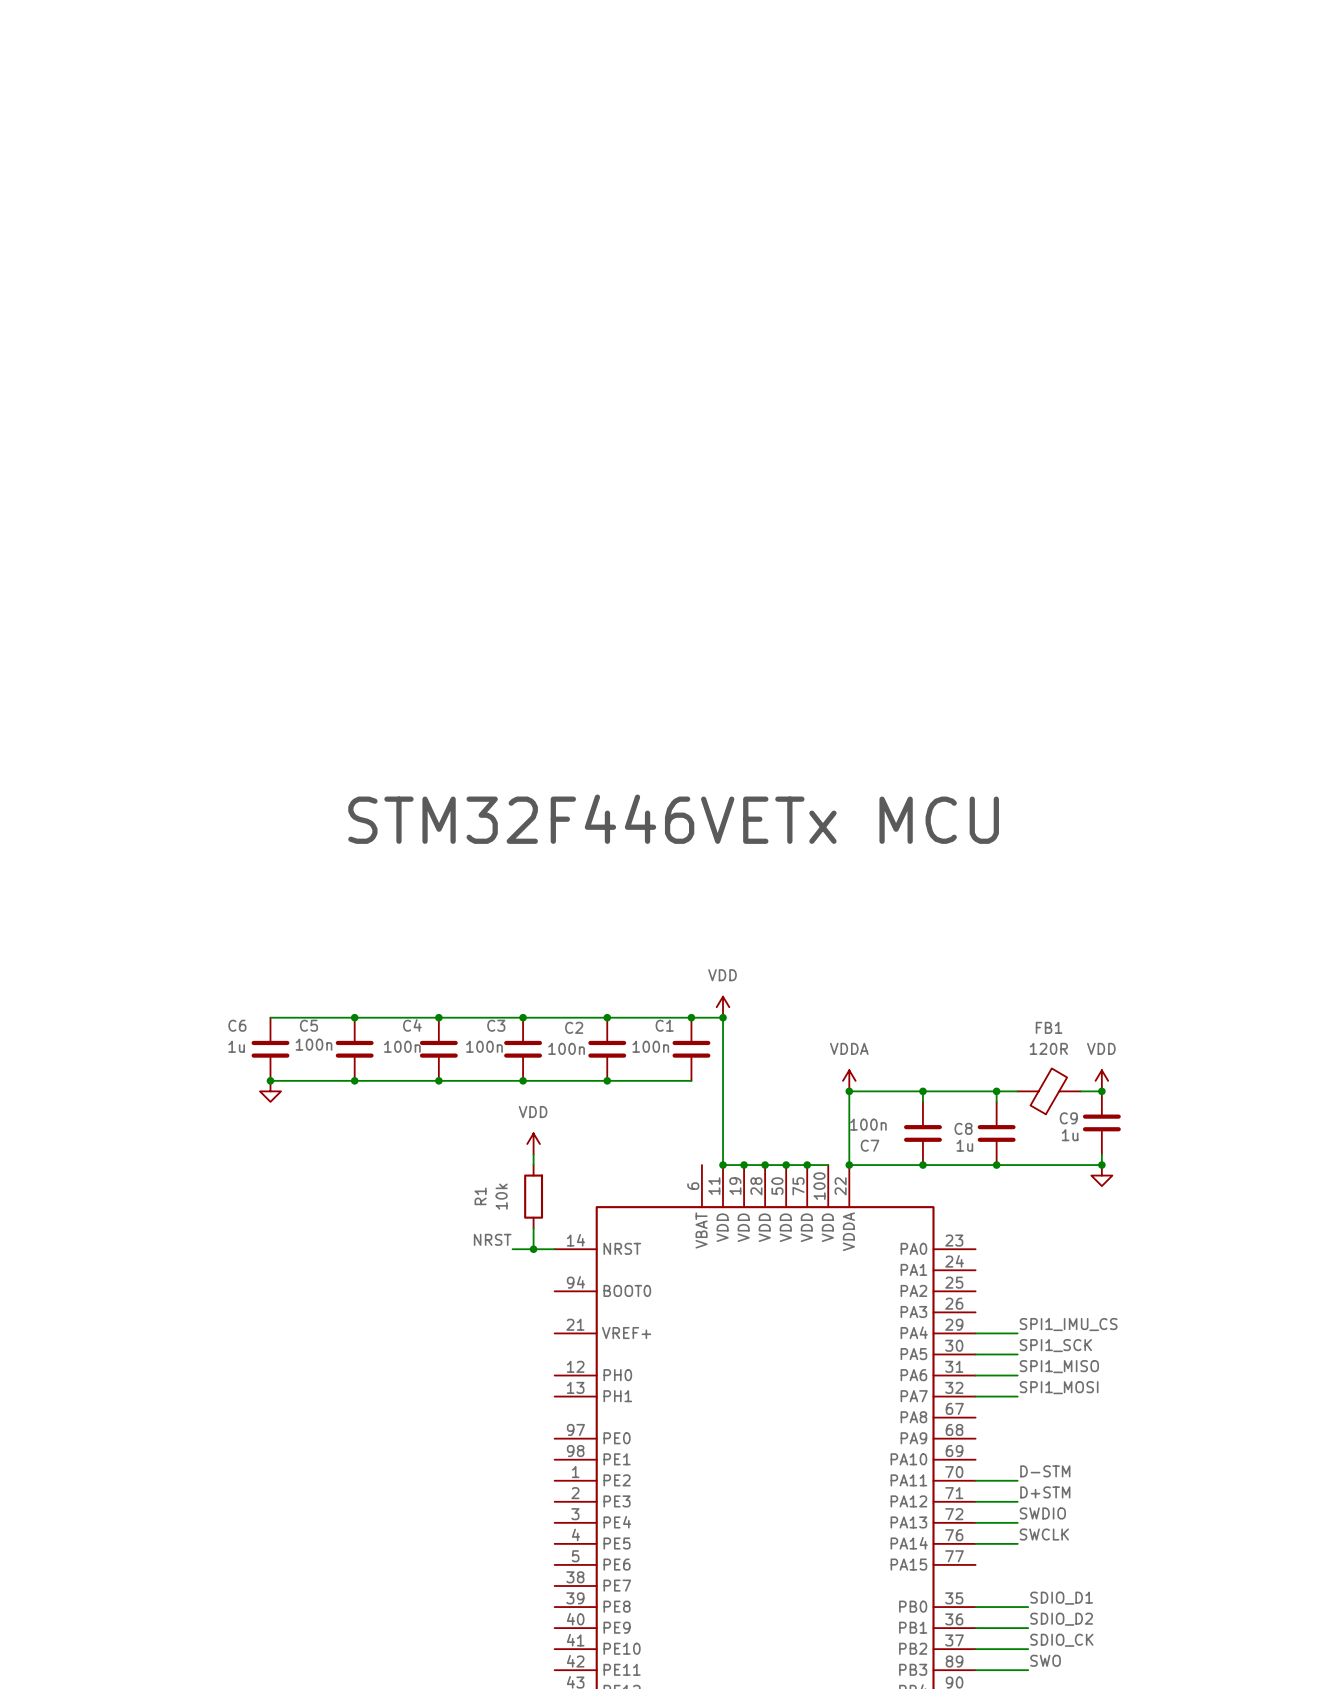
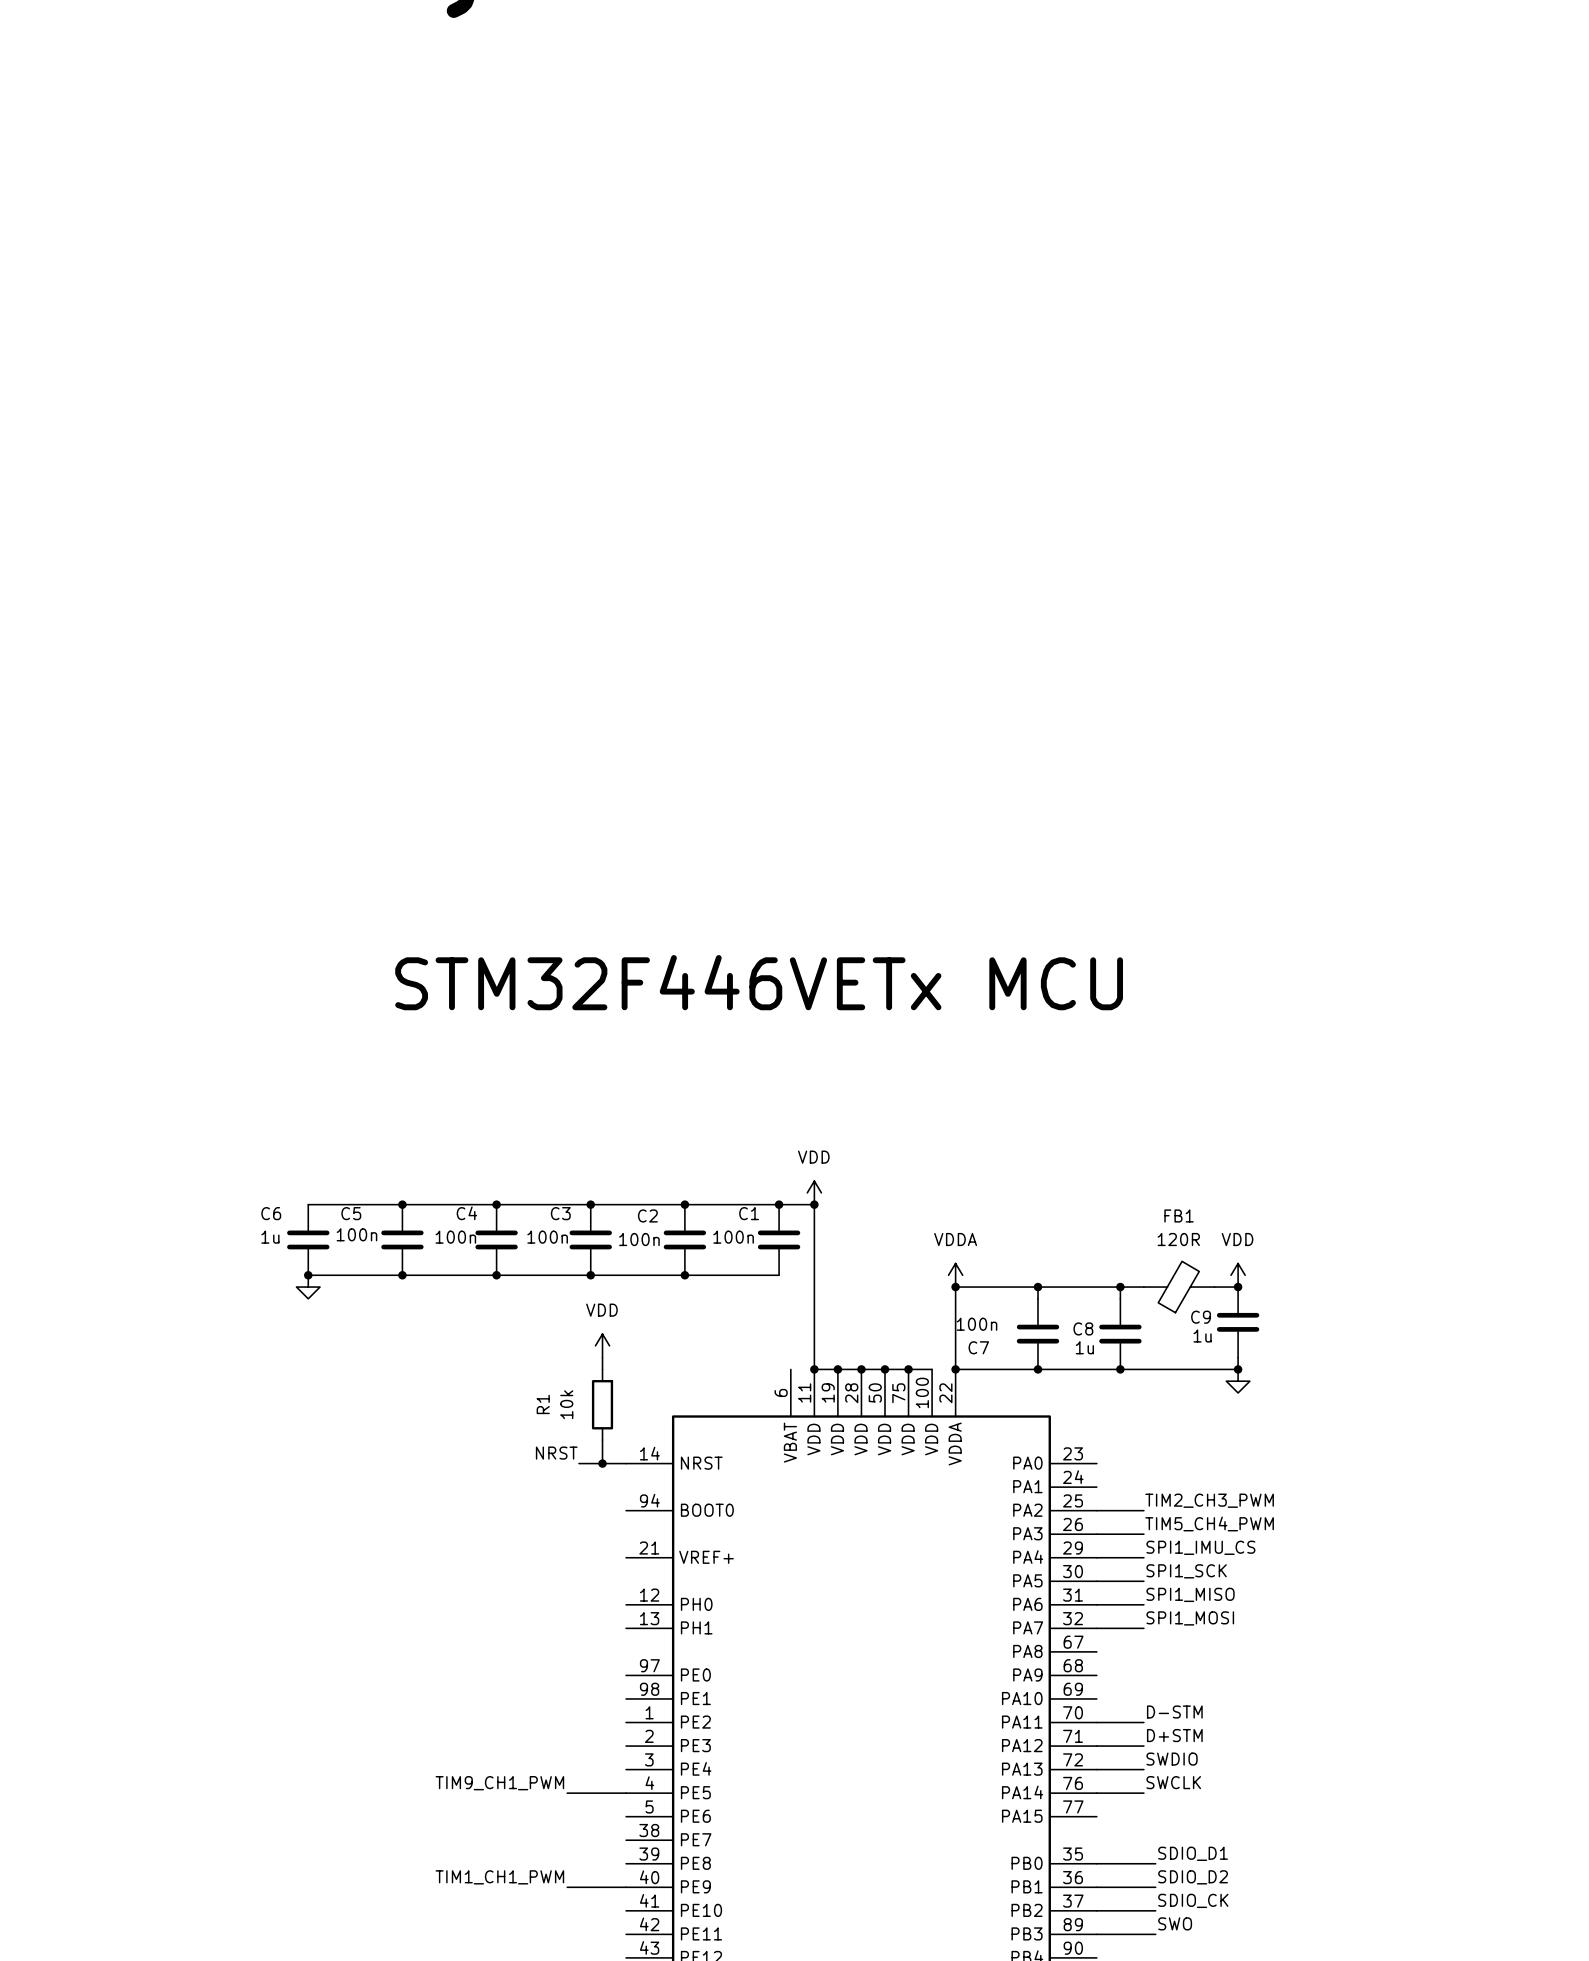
label: none -> TIM2_CH3_PWM (1209, 1500)
wire: none -> (1096, 1510) (1143, 1510)
label: none -> TIM5_CH4_PWM (1209, 1523)
wire: none -> (1096, 1534) (1143, 1534)
label: none -> TIM9_CH1_PWM (499, 1783)
wire: none -> (567, 1793) (626, 1793)
label: none -> TIM1_CH1_PWM (499, 1877)
wire: none -> (567, 1887) (626, 1887)

